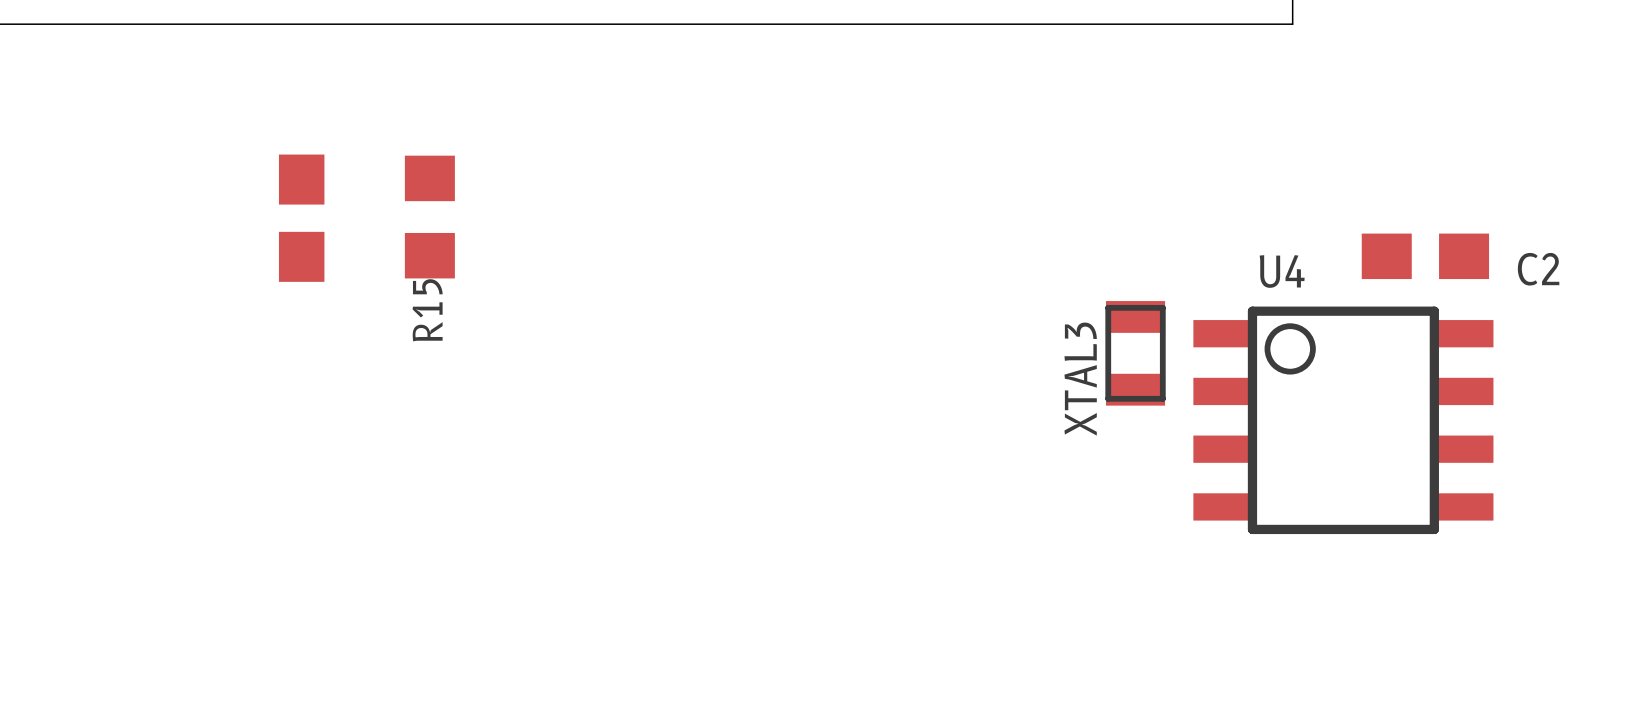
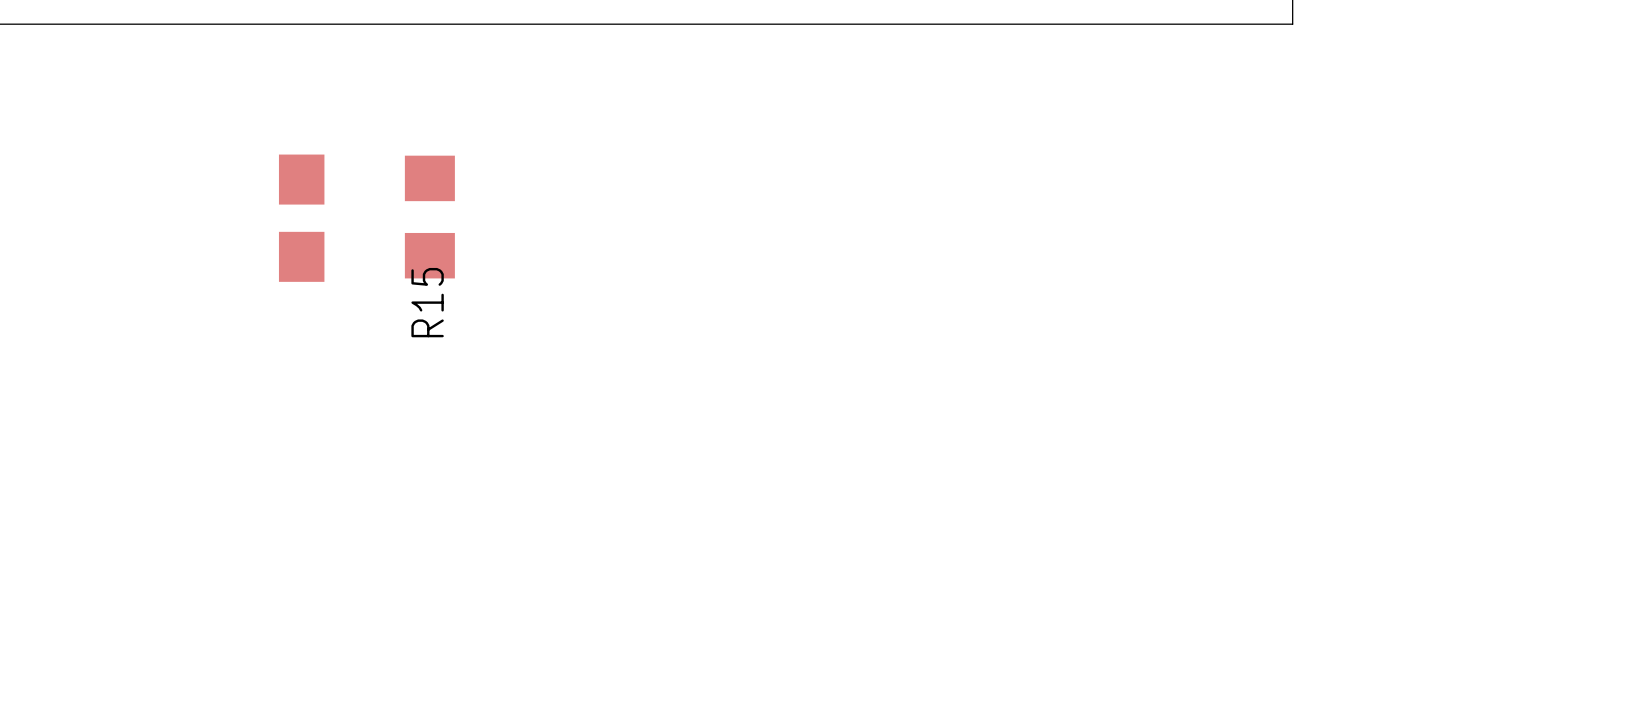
C2: (1425, 256) -> none
XTAL3: (1135, 353) -> none
U4: (1343, 420) -> none

